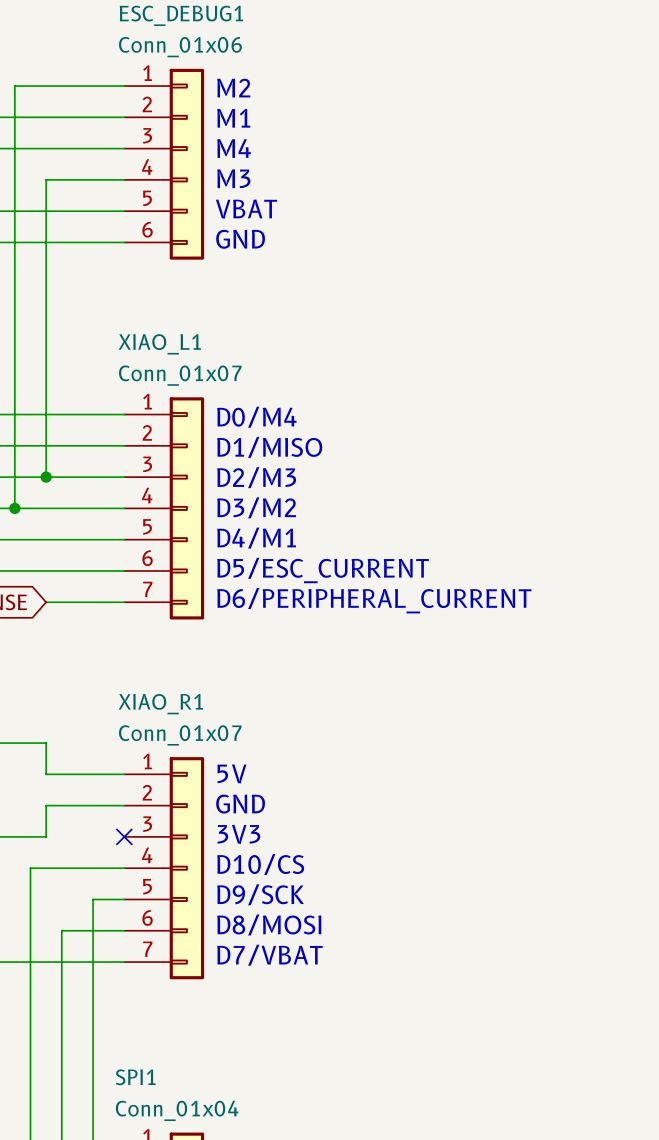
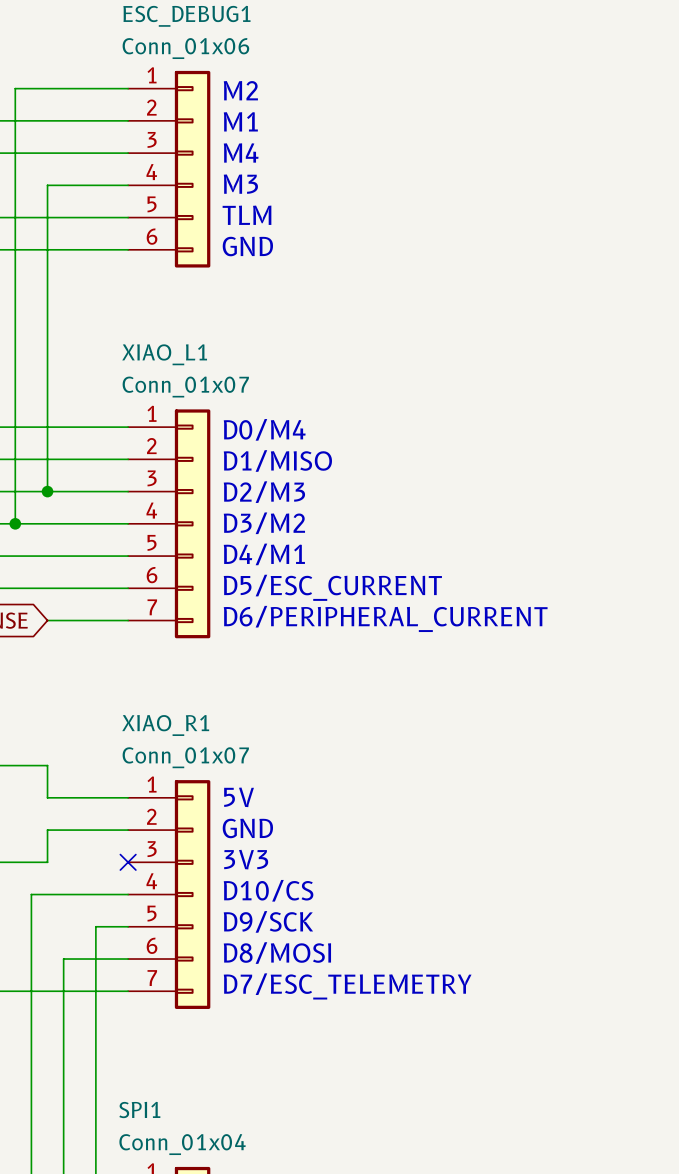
text: VBAT (246, 209) -> TLM (246, 215)
text: D7/VBAT (269, 955) -> D7/ESC_TELEMETRY (347, 986)

